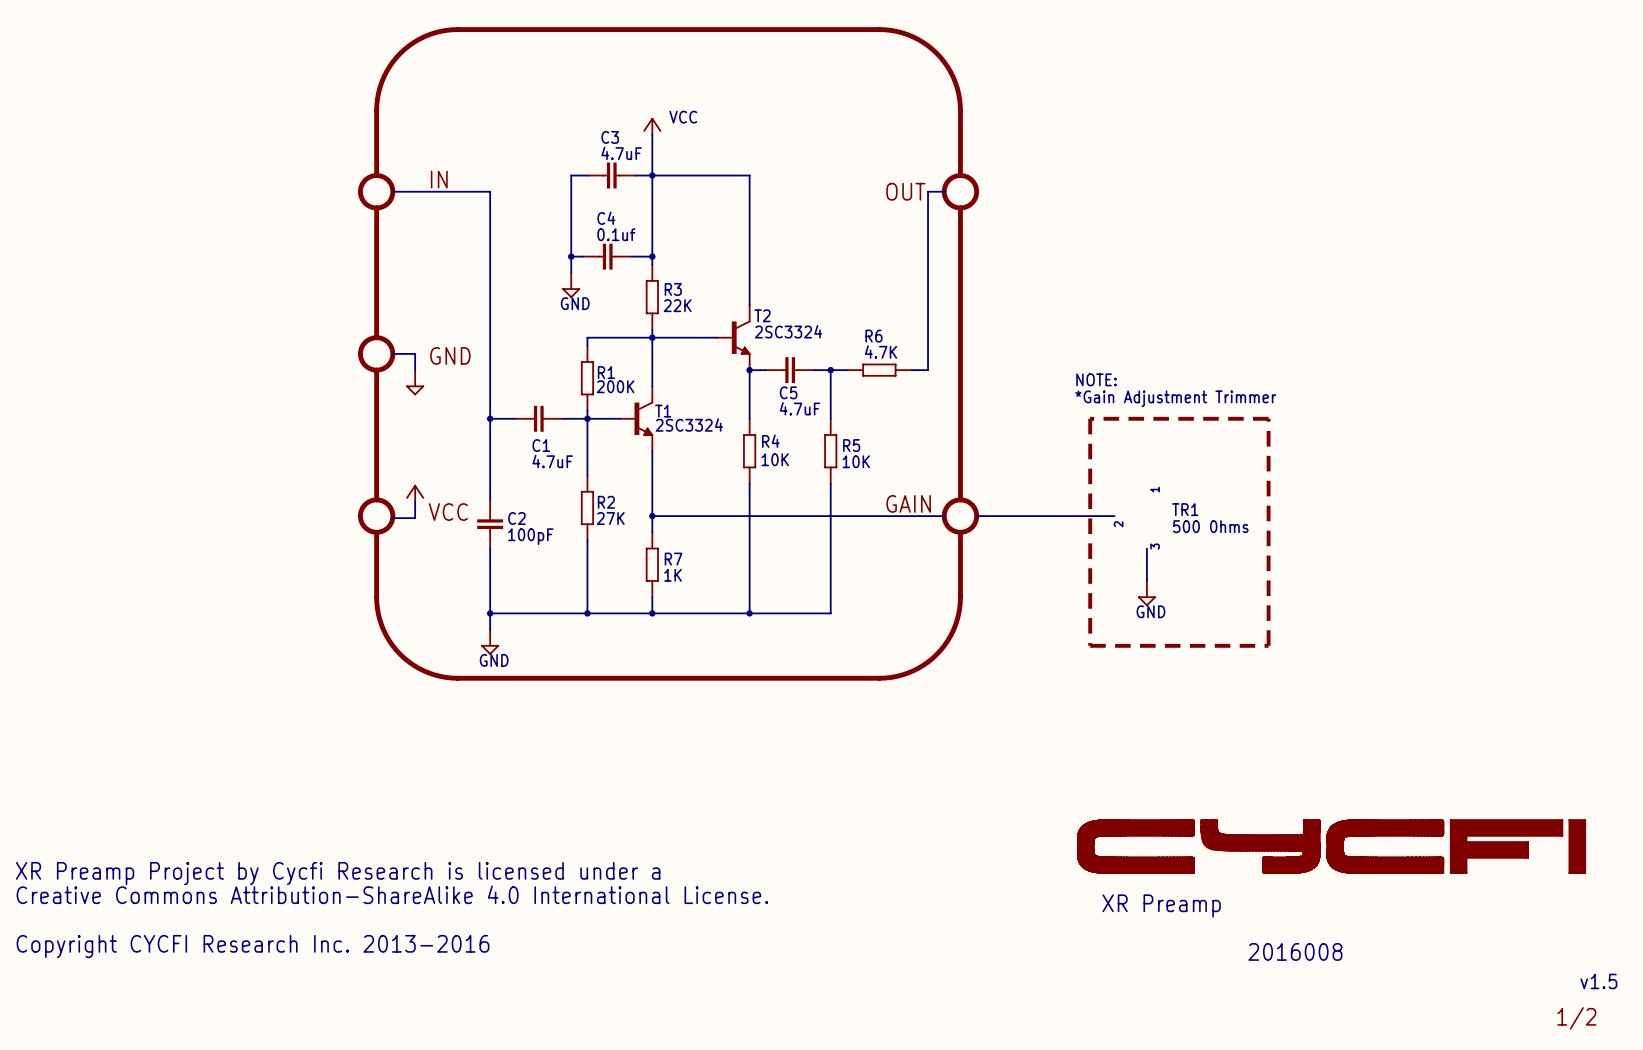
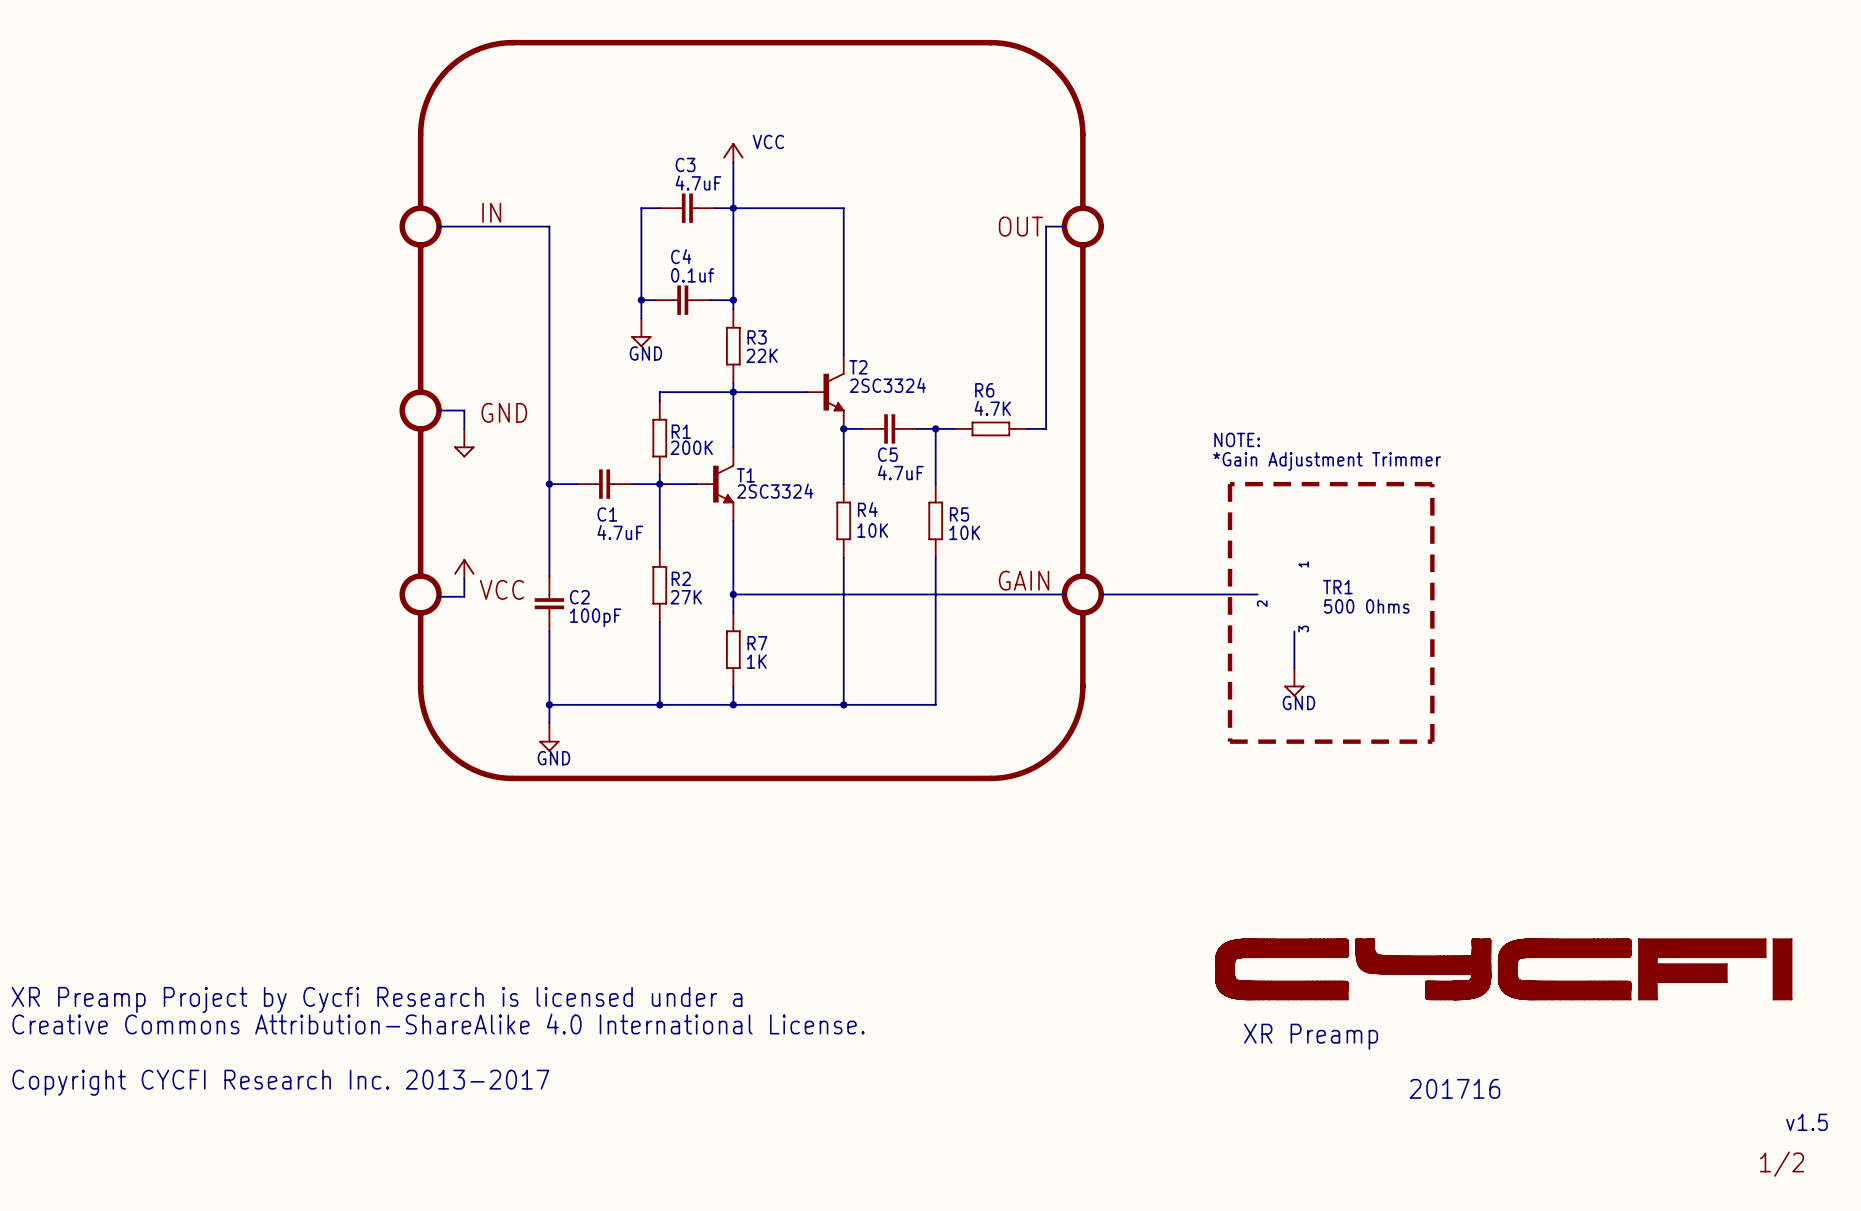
text: Copyright CYCFI Research Inc. 2013-2016 (253, 946) -> Copyright CYCFI Research Inc. 2013-2017 (280, 1082)
text: 2016008 (1295, 951) -> 201716 (1454, 1088)

